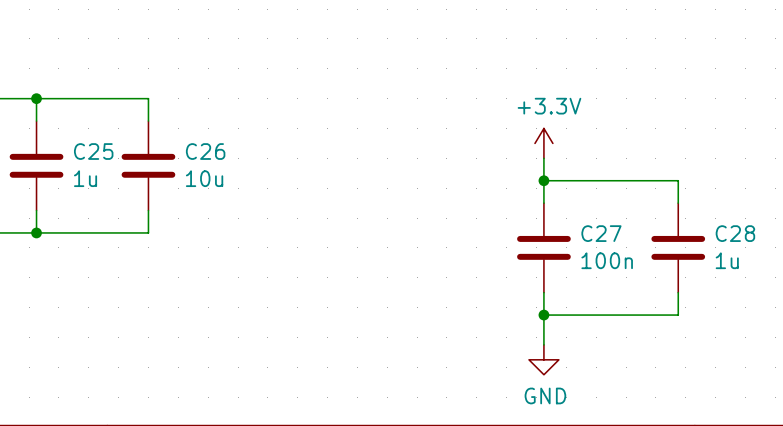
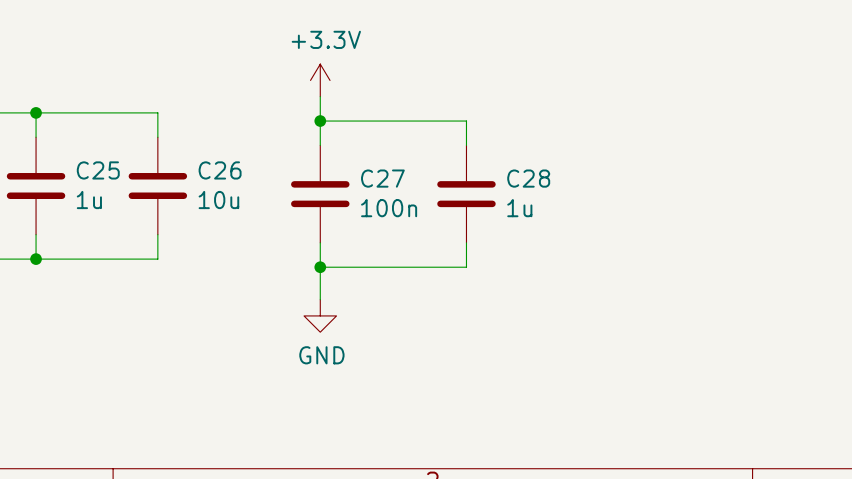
junction: none -> (320, 121)
power symbol position: +3.3V (543, 143) -> +3.3V (320, 80)
wire: (543, 158) (543, 203) -> (320, 96) (320, 145)
wire: (543, 180) (678, 180) (678, 203) -> (320, 121) (466, 121) (466, 145)
junction: (543, 180) -> none
junction: none -> (320, 267)
C27 position: (543, 247) -> (320, 194)
C28 position: (678, 247) -> (466, 194)
wire: (543, 292) (543, 344) -> (320, 242) (320, 299)
wire: (678, 292) (678, 315) (543, 315) -> (466, 242) (466, 267) (320, 267)
junction: (543, 315) -> none
power symbol position: GND (543, 359) -> GND (320, 315)

